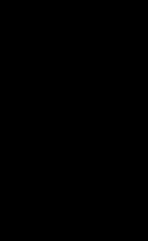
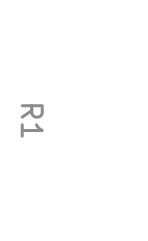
R1: none -> (32, 120)

